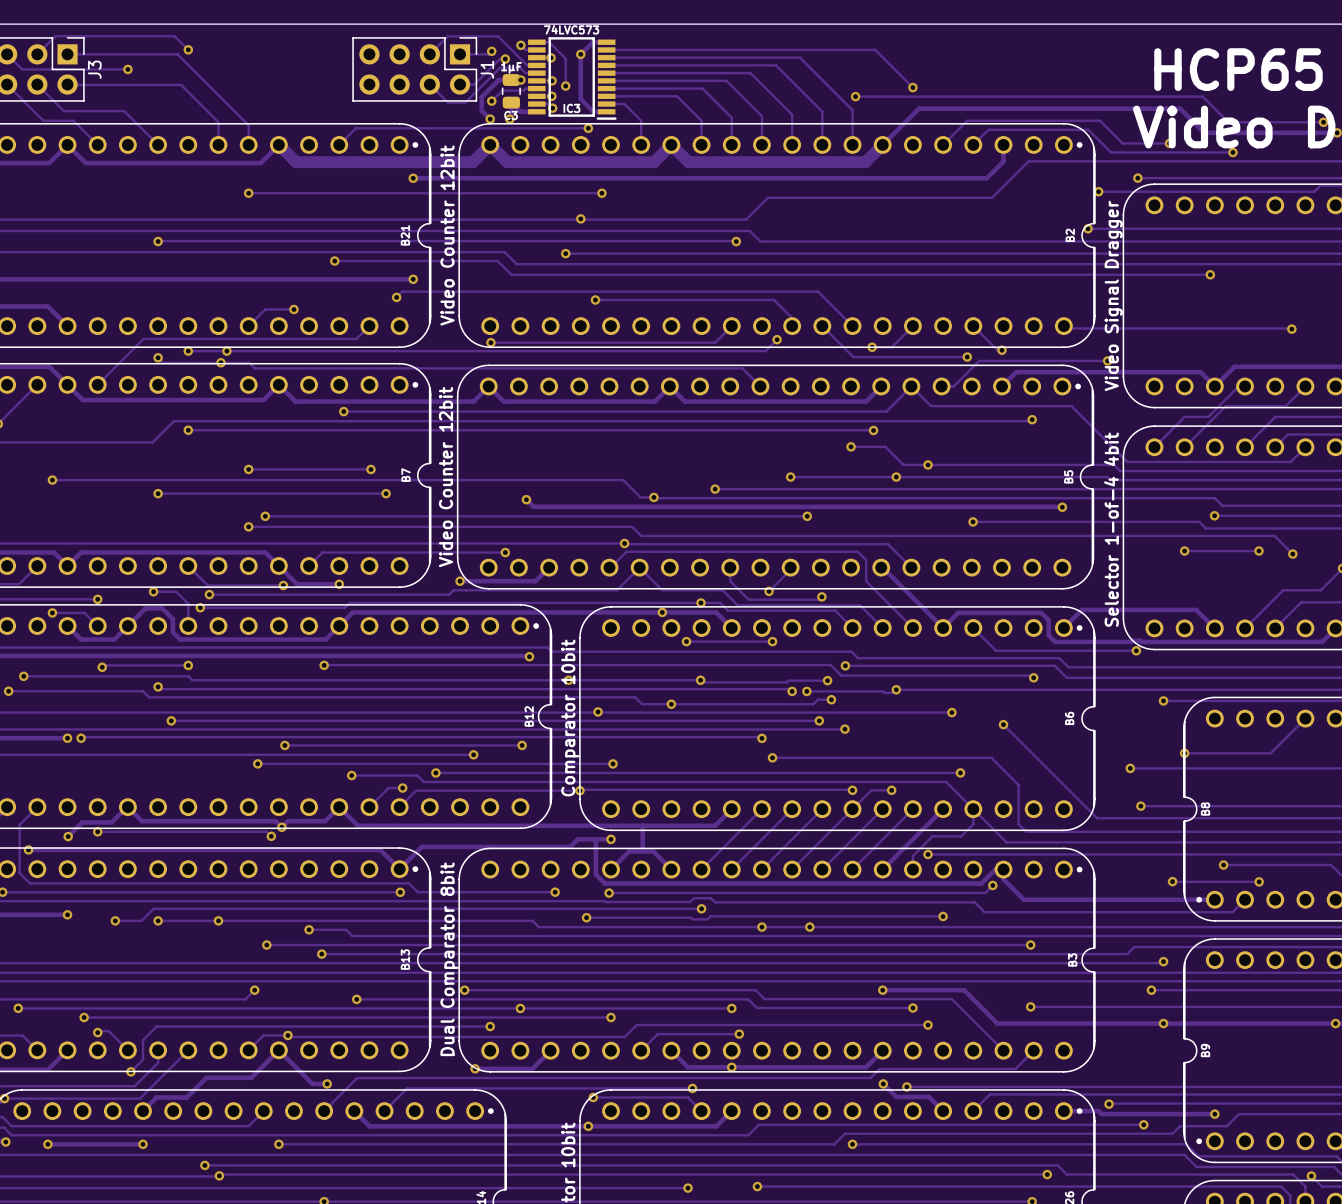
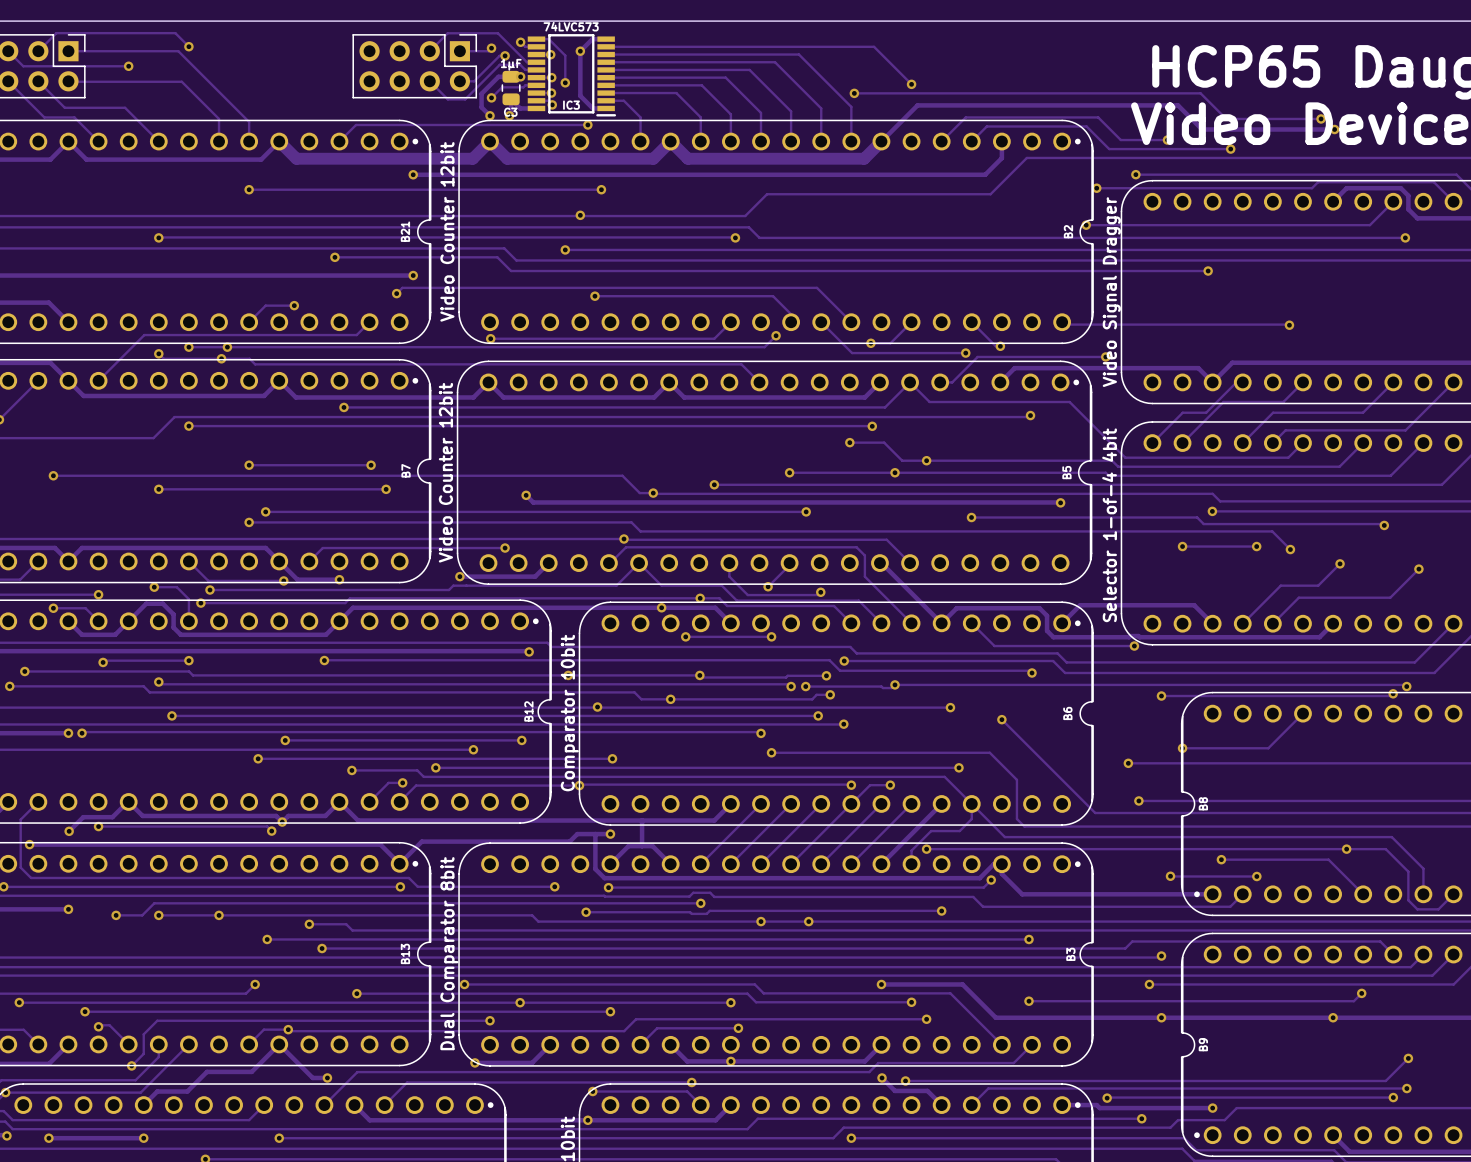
J3 name: J3 (94, 69) -> none
J1 name: J1 (487, 69) -> none

